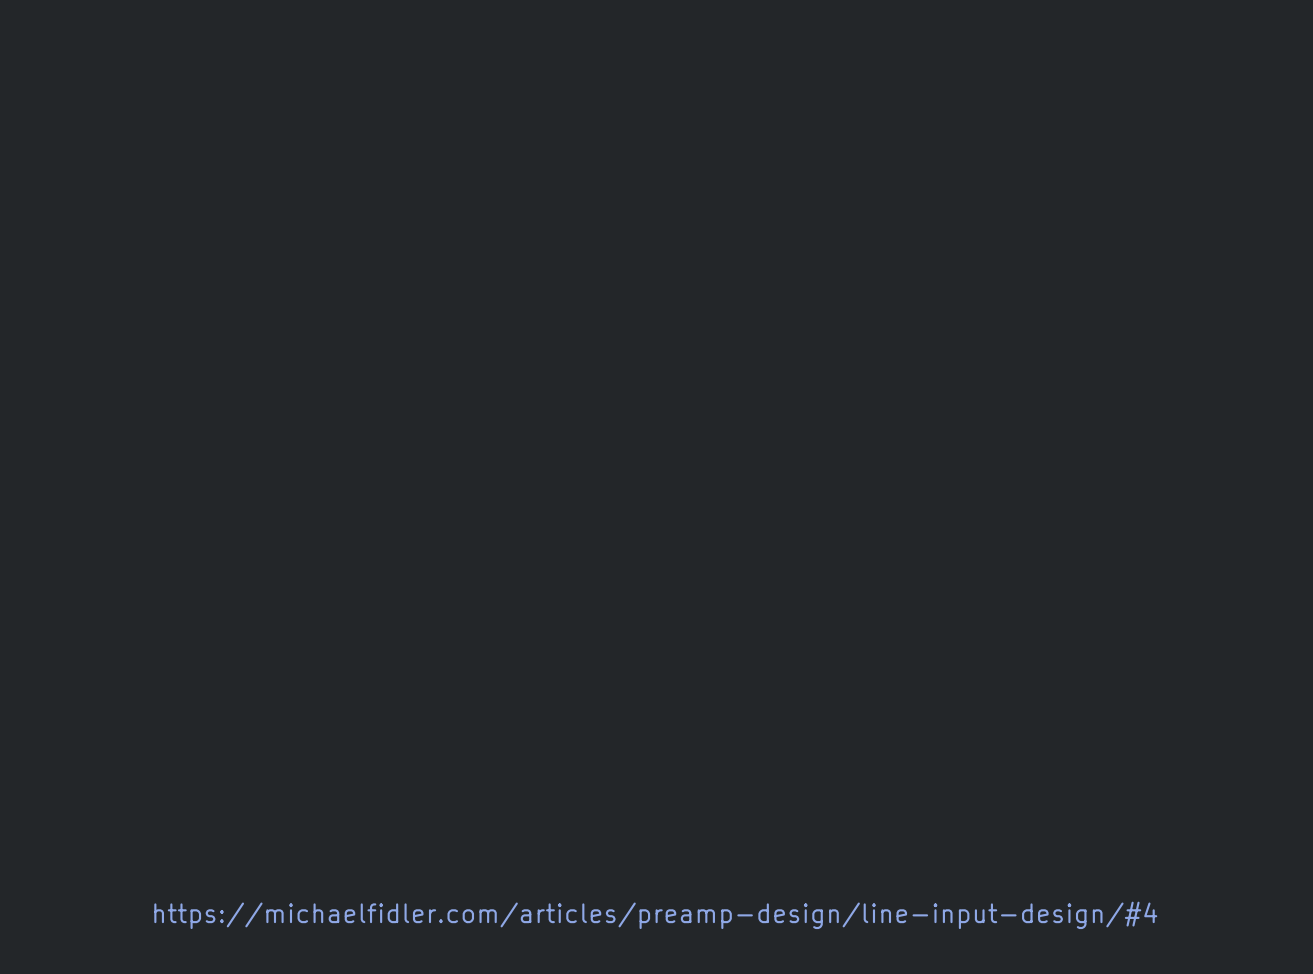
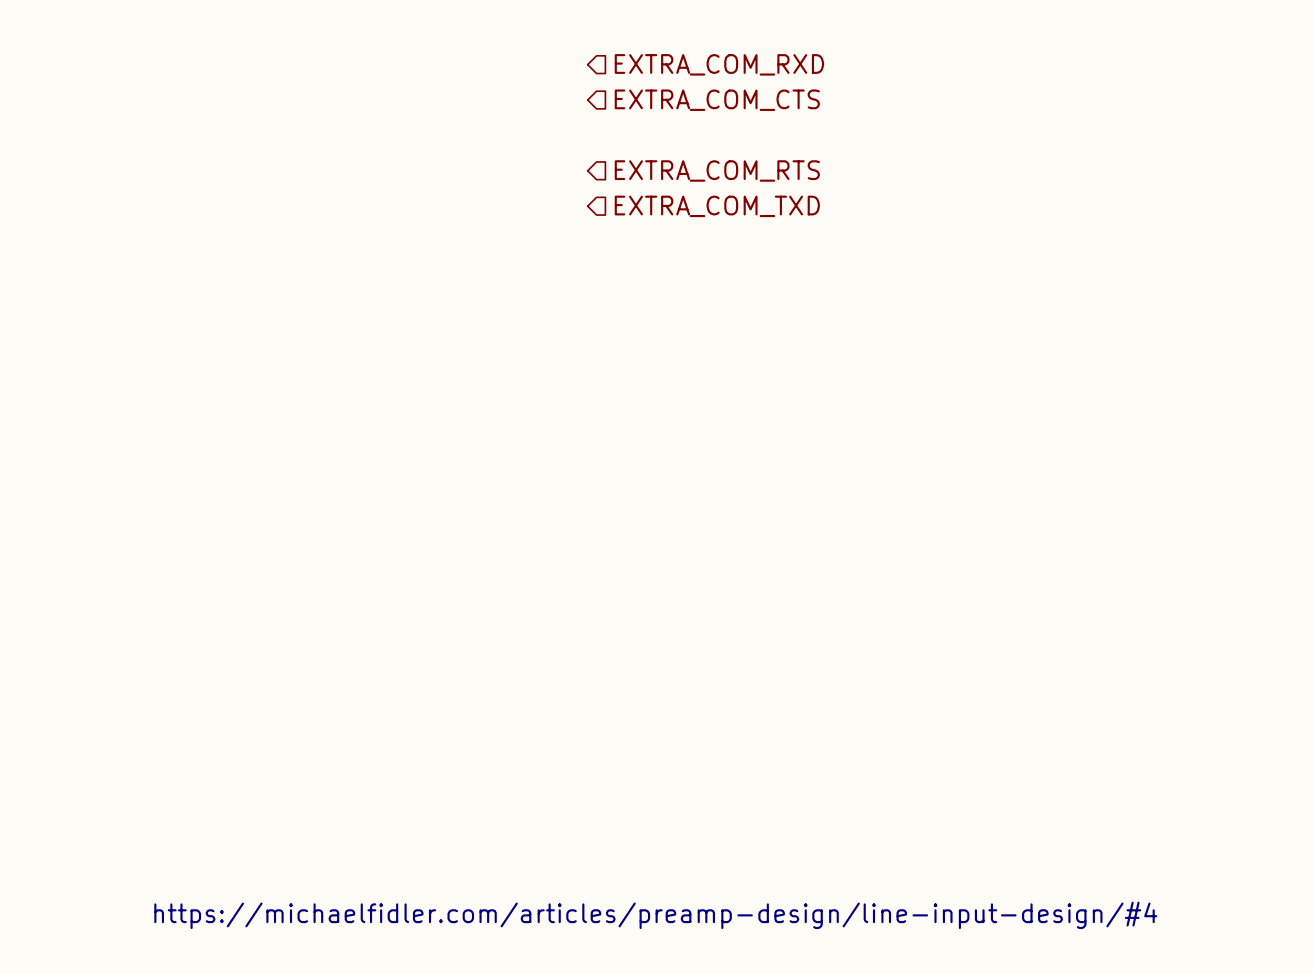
hierarchical label: none -> EXTRA_COM_RXD (719, 64)
hierarchical label: none -> EXTRA_COM_CTS (717, 100)
hierarchical label: none -> EXTRA_COM_RTS (717, 170)
hierarchical label: none -> EXTRA_COM_TXD (717, 206)

